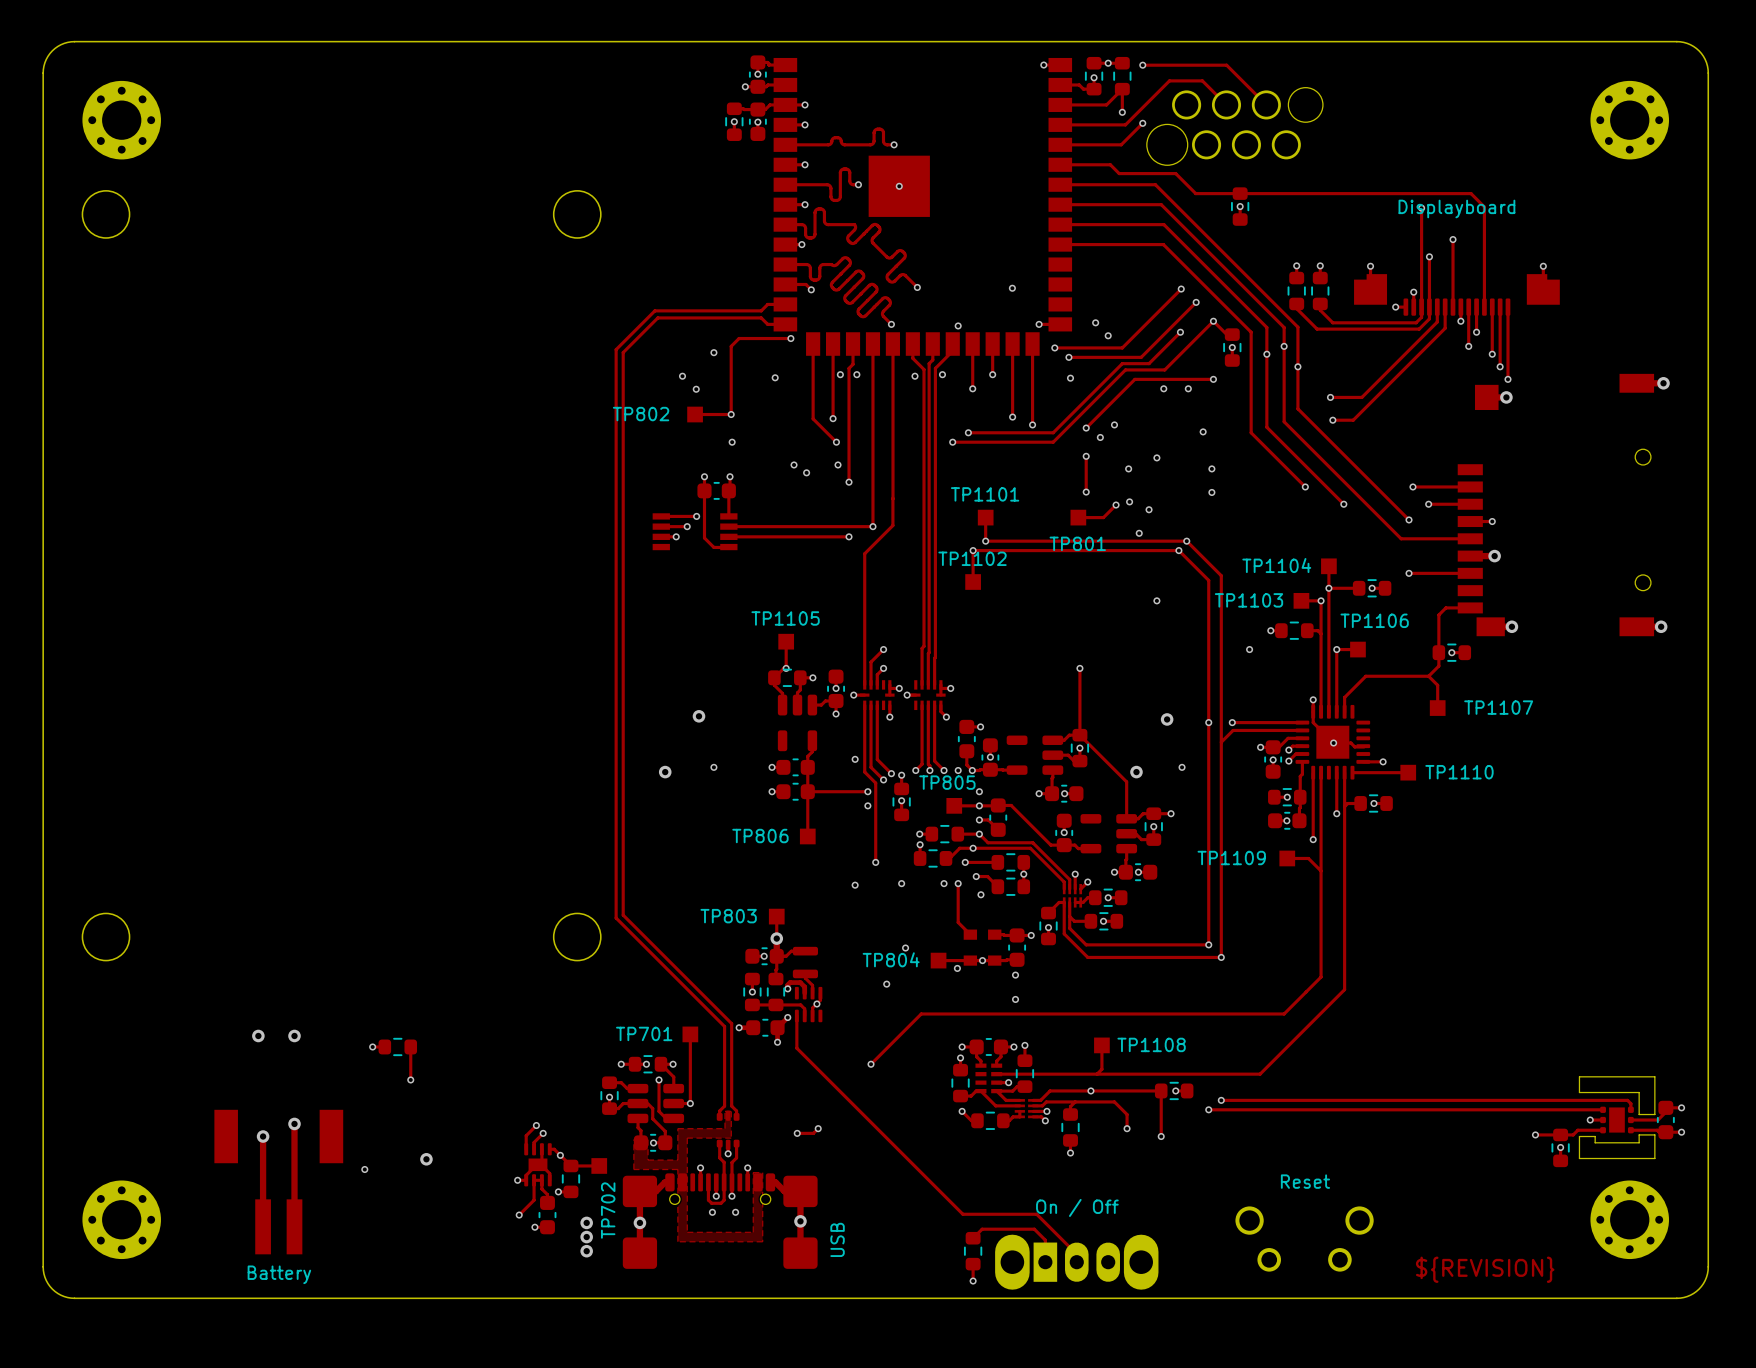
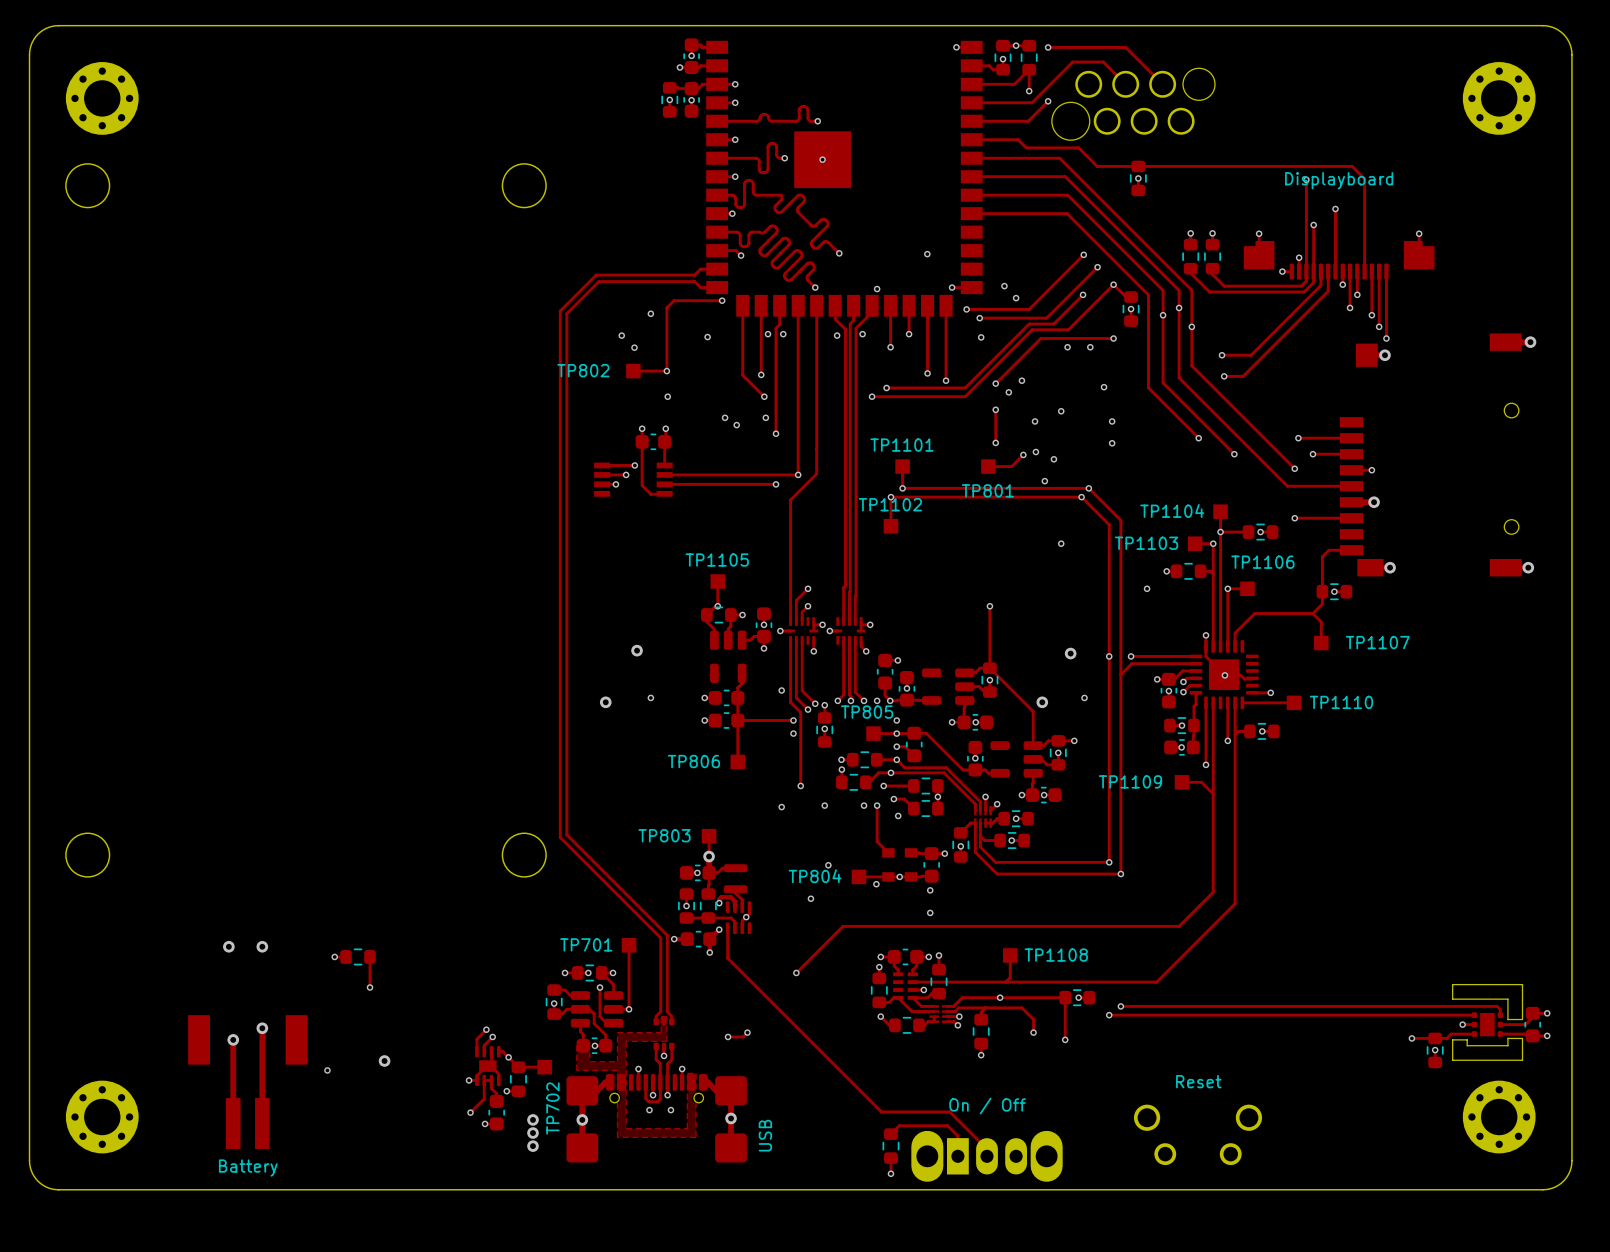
text: ${REVISION} (1485, 1269) -> none

